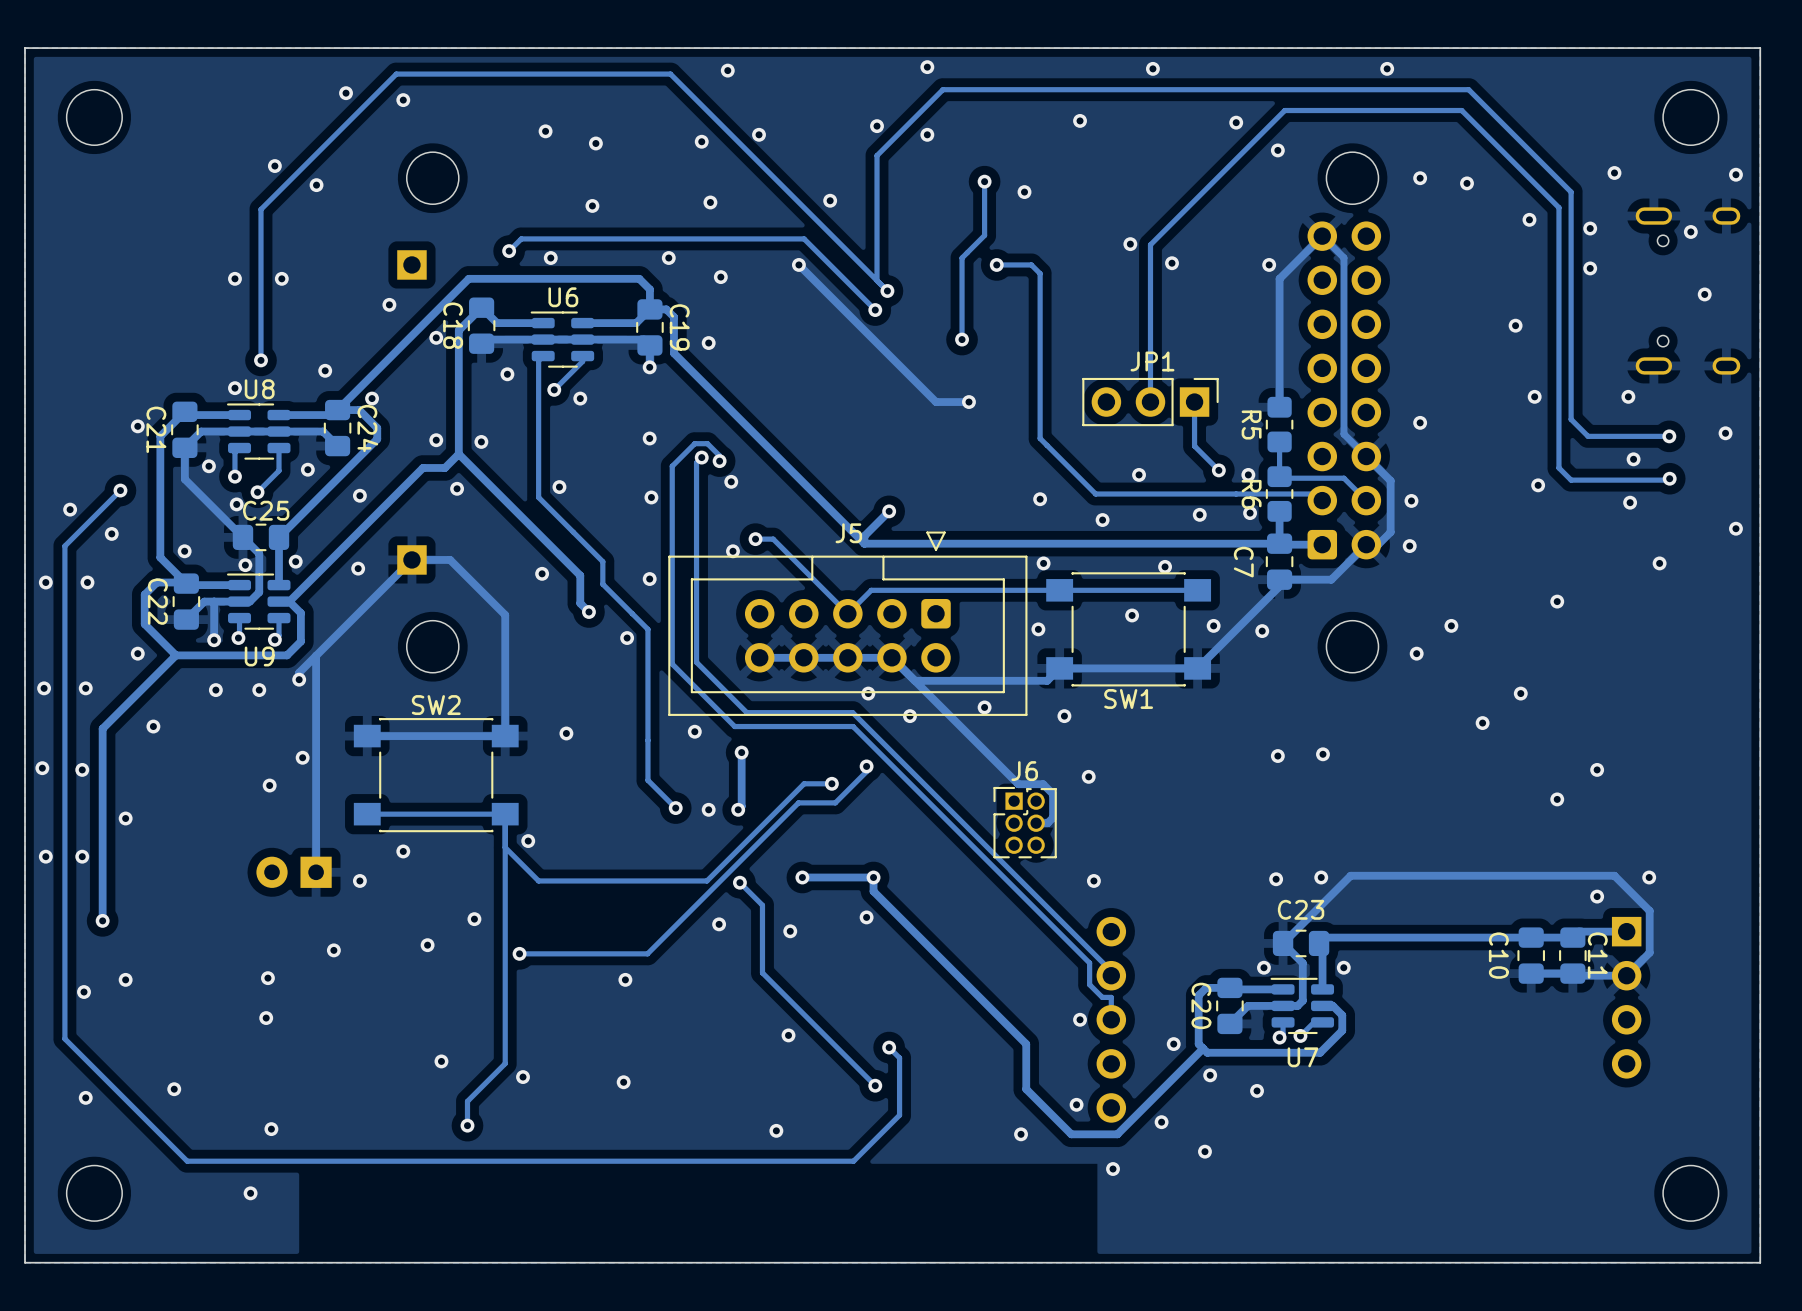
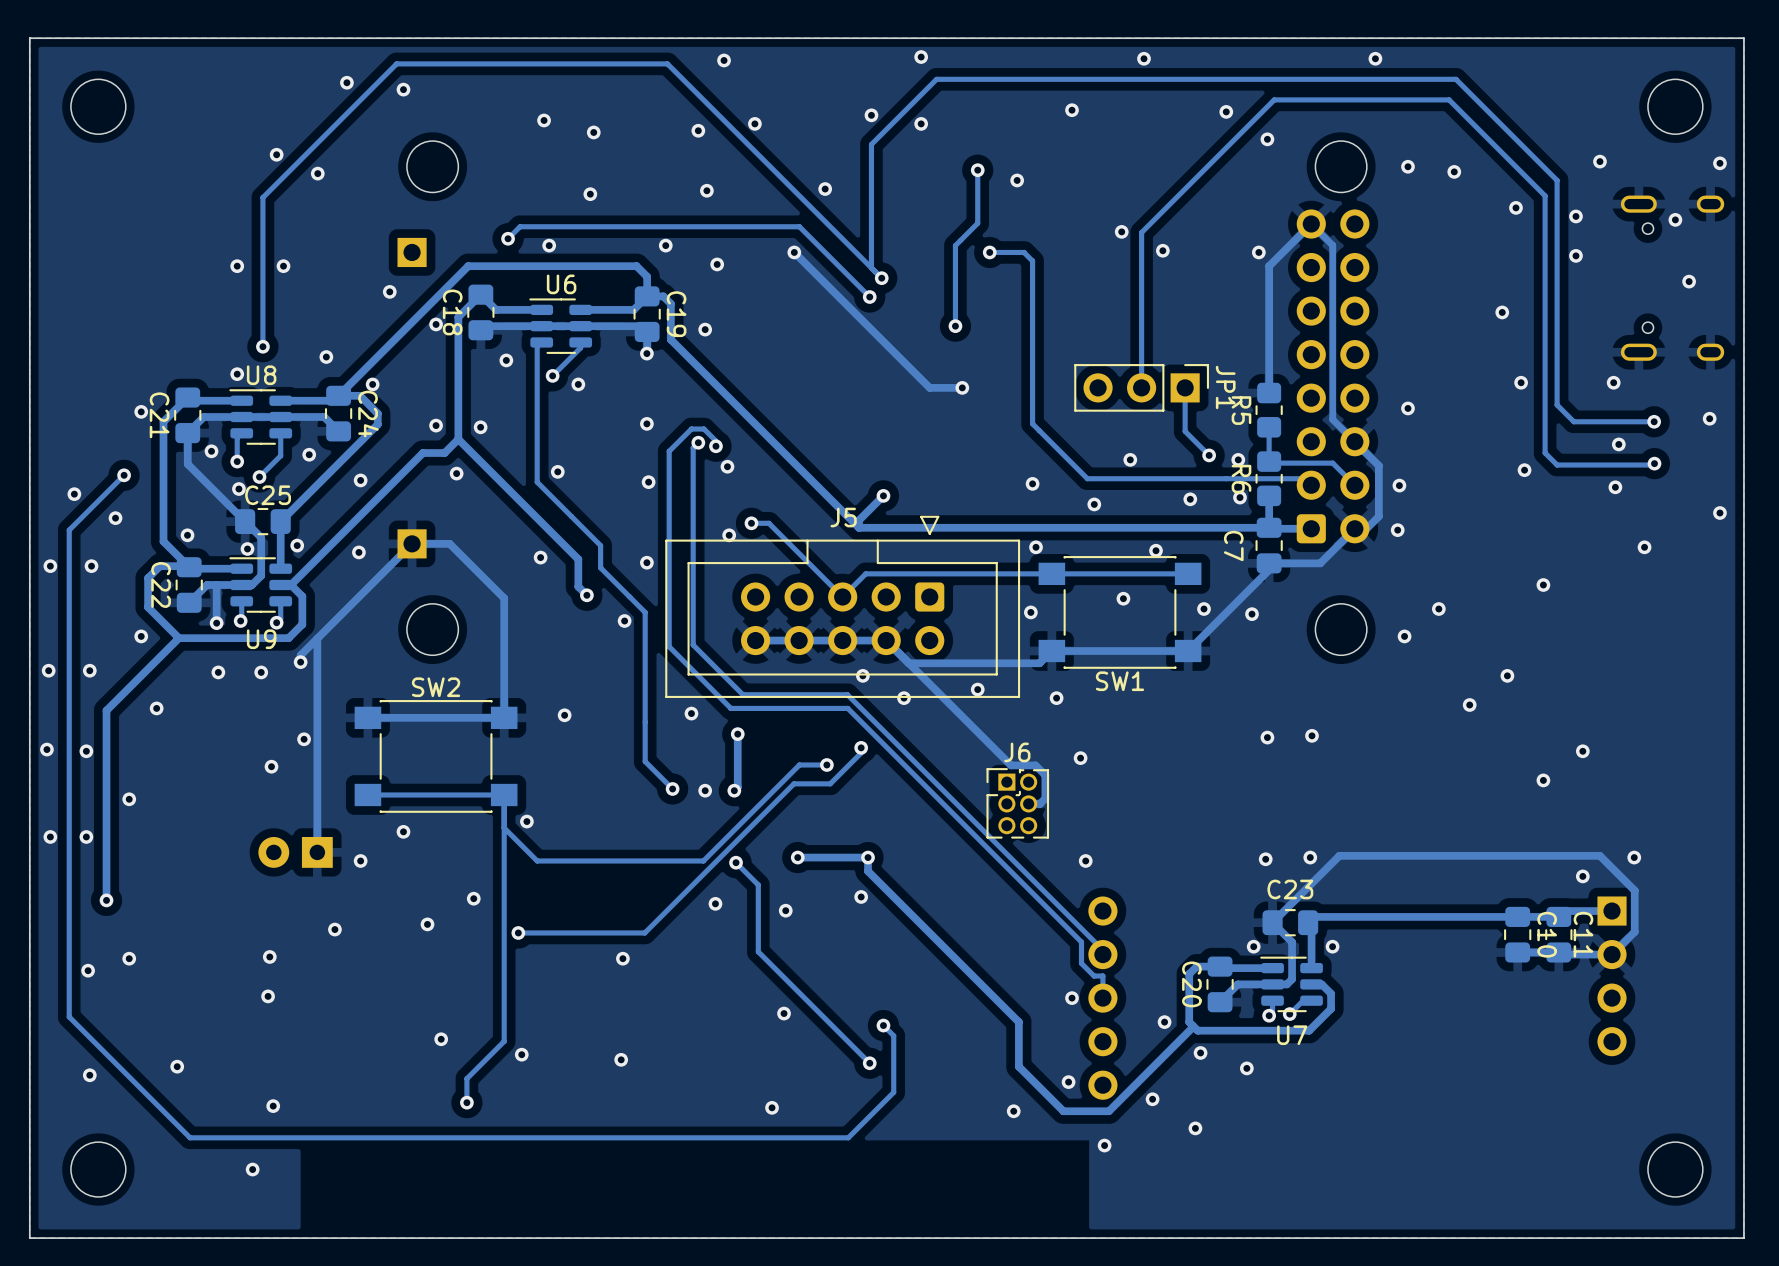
JP1 name rotation: 0° (1152, 361) -> 90° clockwise (1225, 387)
JP1 name position: JP1 (1152, 361) -> JP1 (1225, 387)
C10 name position: C10 (1498, 955) -> C10 (1547, 934)

